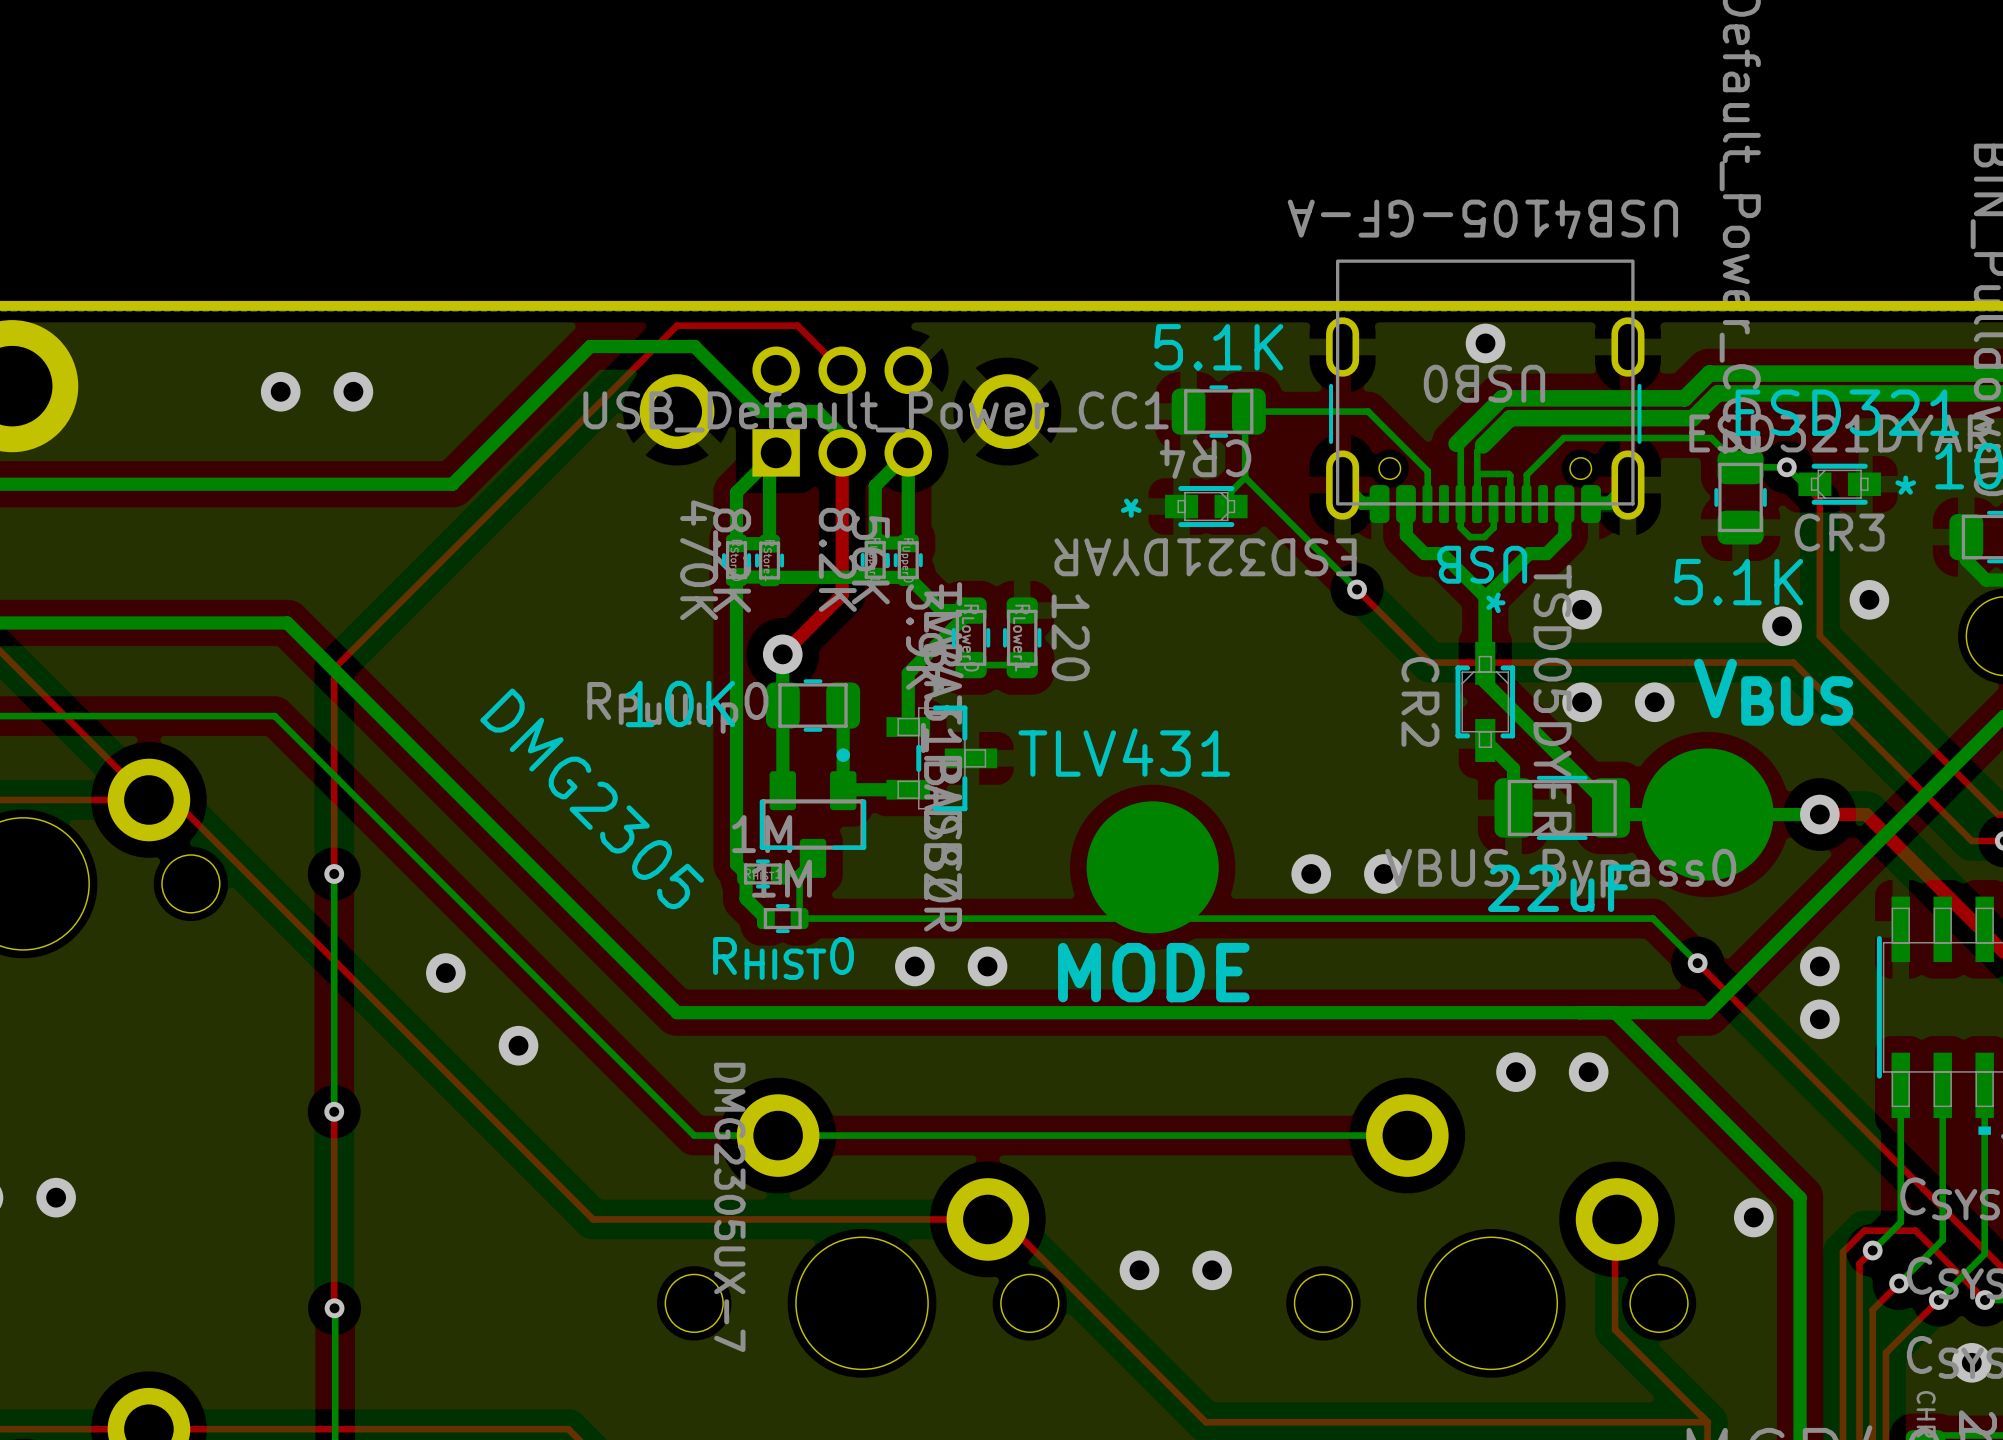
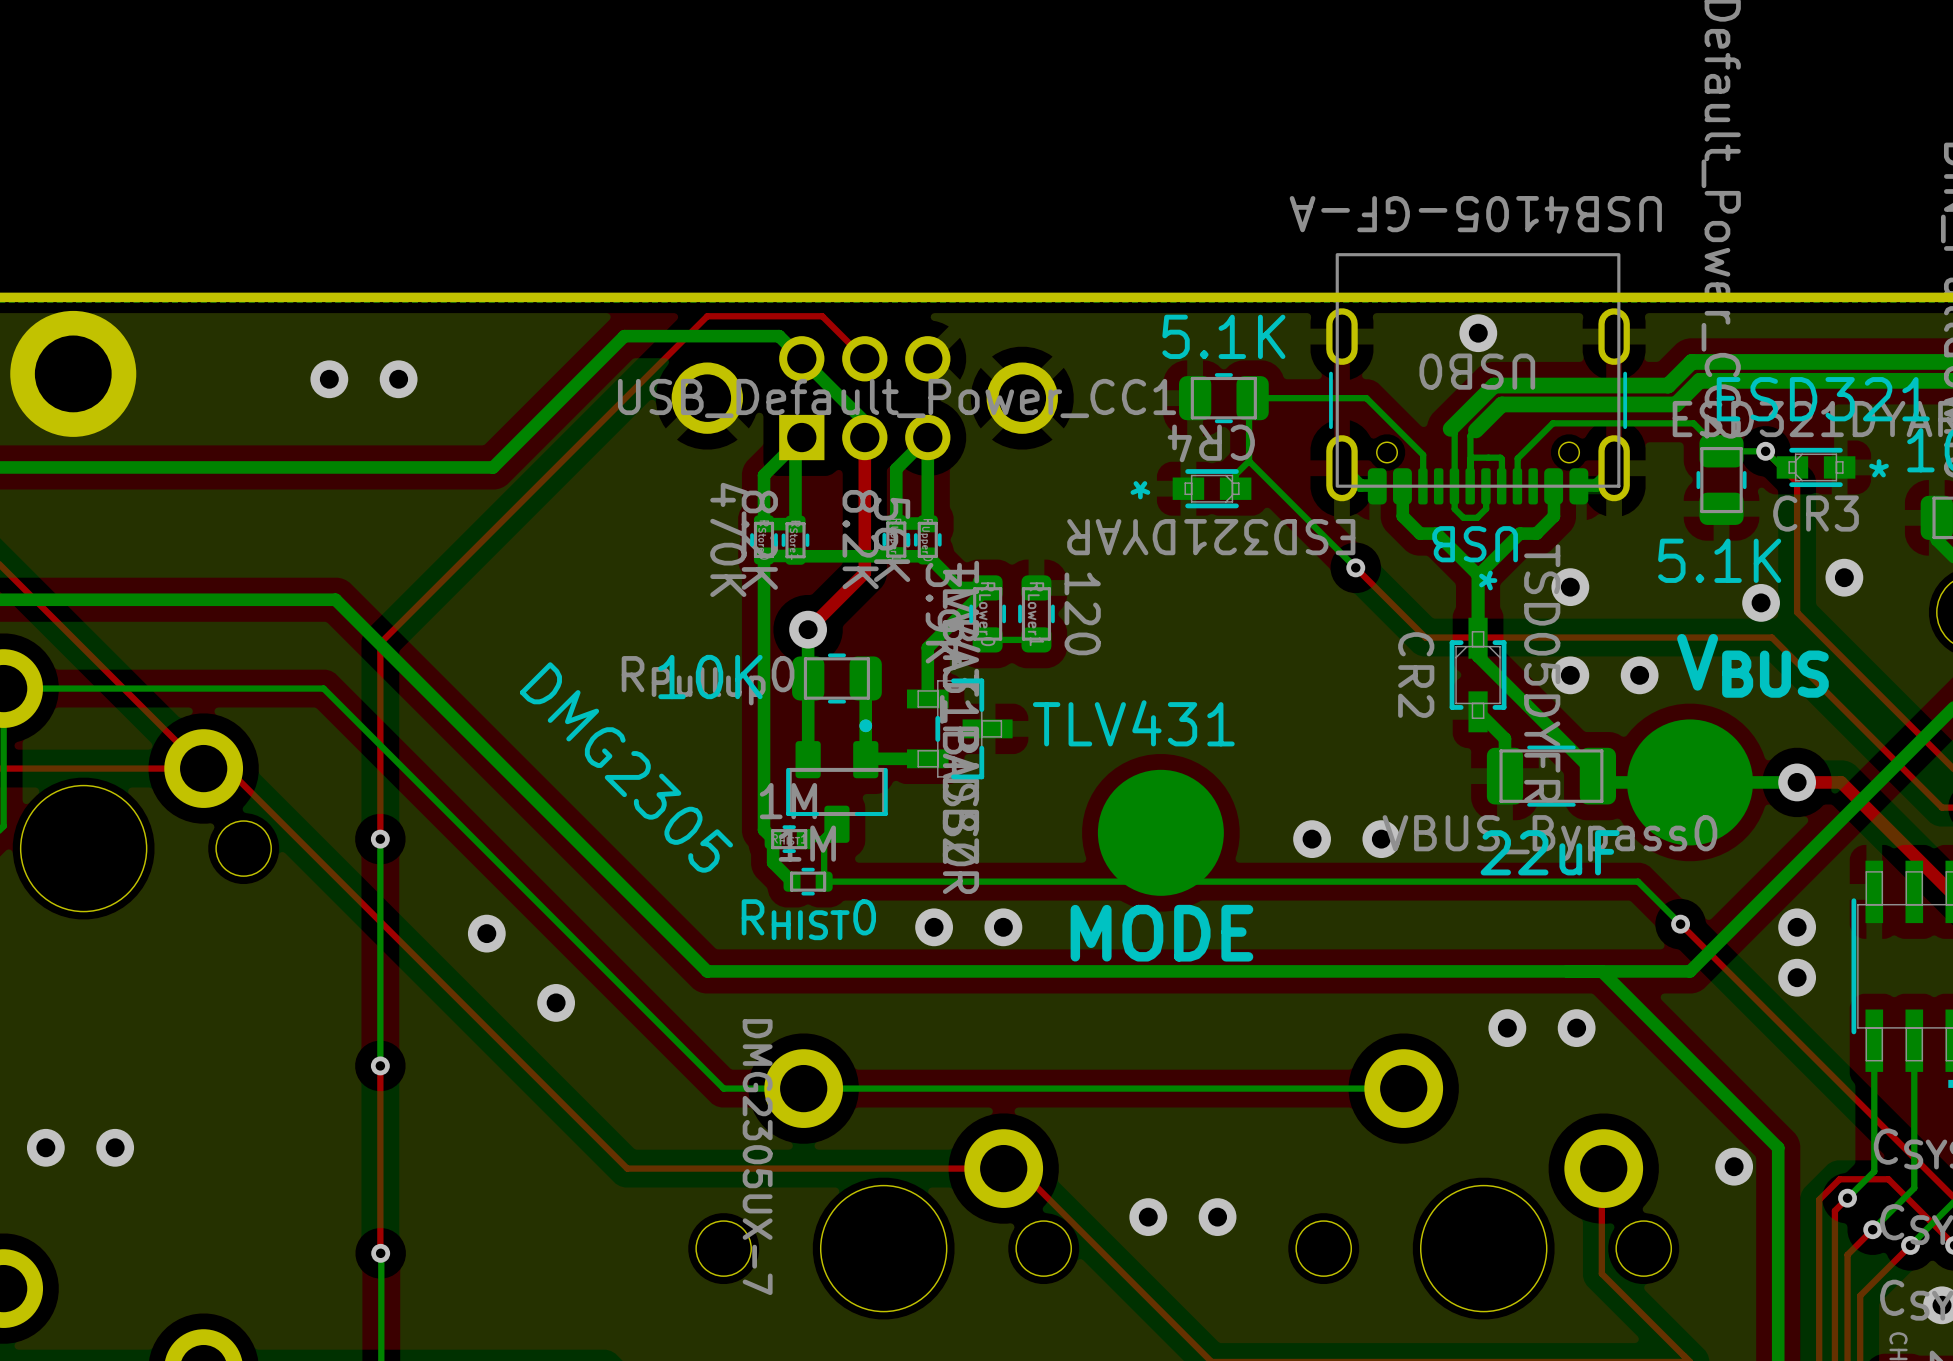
bottom track: (694, 346) (759, 411) (817, 411) -> (724, 336) (779, 336) (841, 398)

